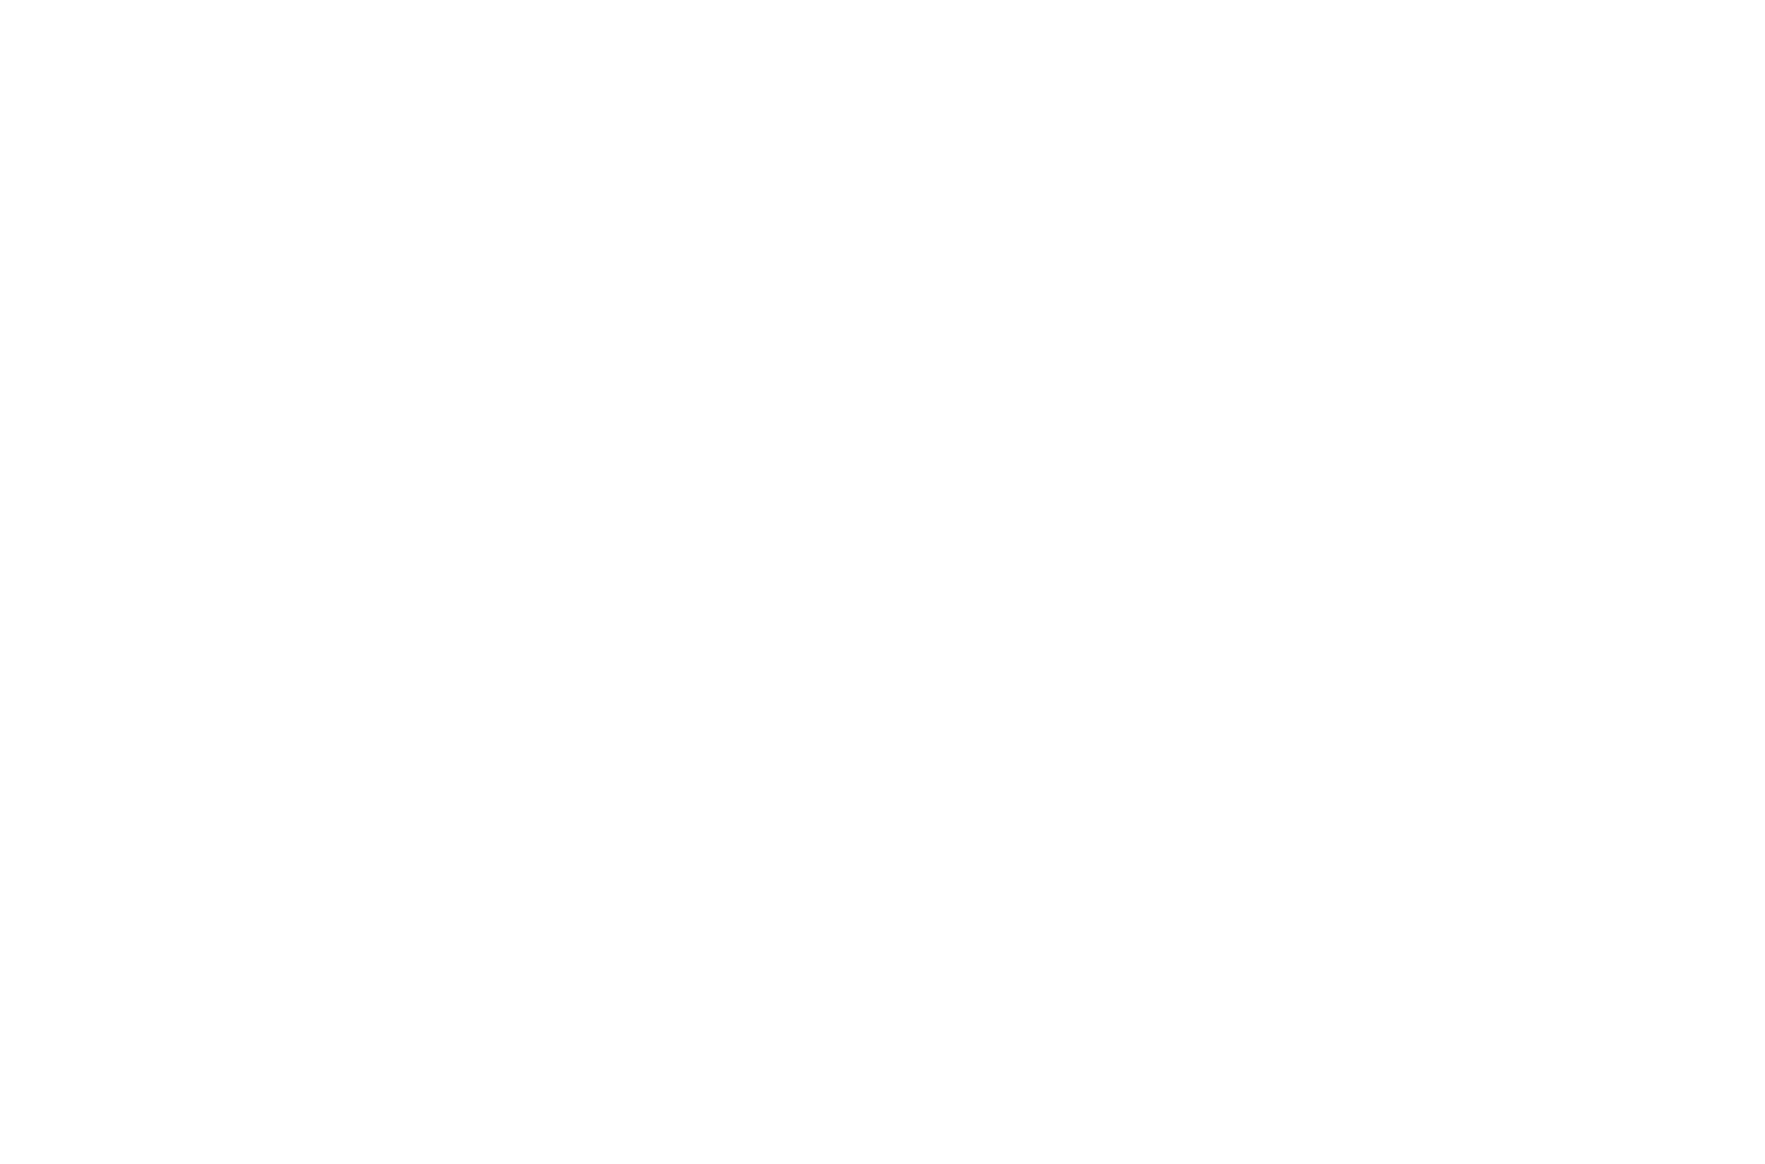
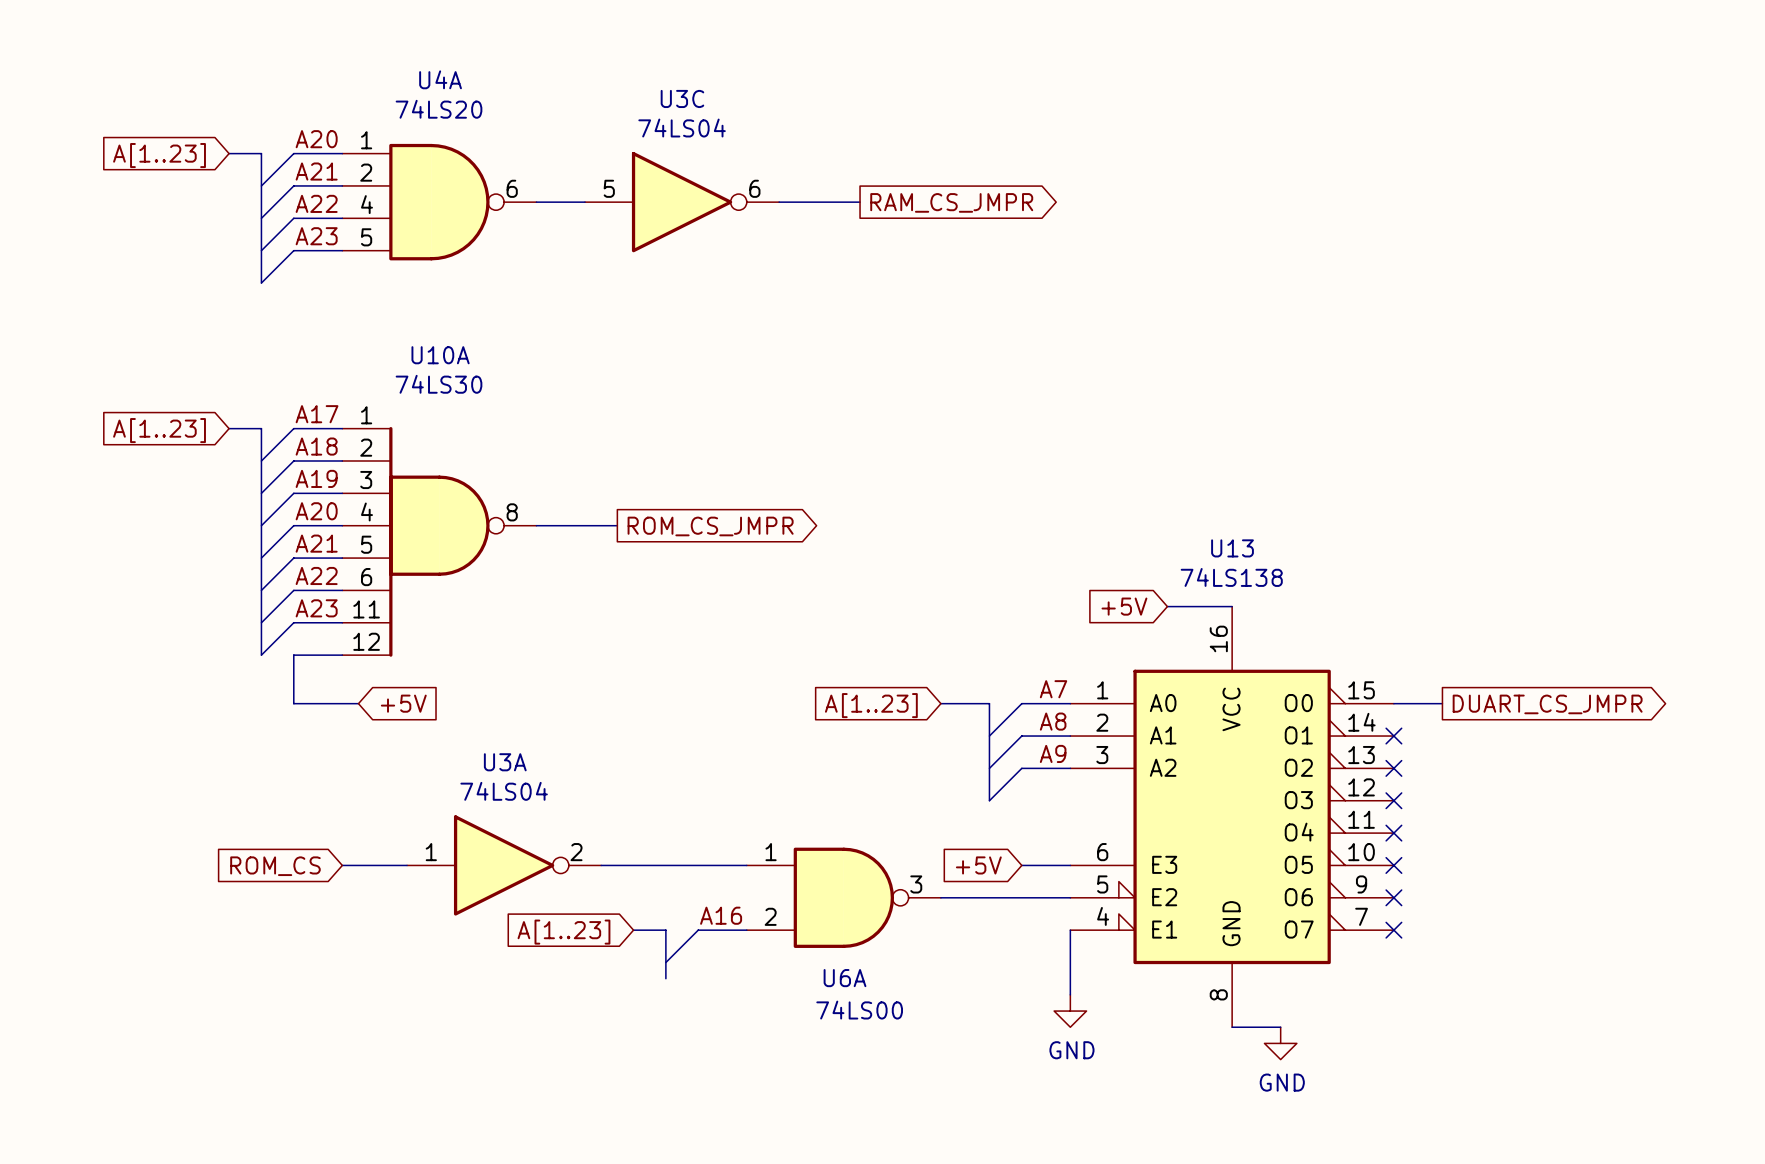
label: none -> A20 (316, 139)
bus: none -> (229, 153) (261, 153) (261, 283)
wire: none -> (342, 153) (293, 153) (261, 185)
global label: none -> A[1..23] (159, 155)
label: none -> A21 (316, 171)
wire: none -> (342, 185) (293, 185) (261, 218)
U4A: none -> 74LS20 (439, 202)
wire: none -> (536, 202) (585, 202)
U3C: none -> 74LS04 (682, 202)
wire: none -> (779, 202) (860, 202)
global label: none -> RAM_CS_JMPR (951, 202)
label: none -> A22 (316, 203)
wire: none -> (342, 218) (293, 218) (261, 250)
label: none -> A23 (316, 236)
wire: none -> (342, 250) (293, 250) (261, 283)
label: none -> A17 (317, 414)
bus: none -> (229, 428) (261, 428) (261, 655)
wire: none -> (342, 428) (293, 428) (261, 460)
global label: none -> A[1..23] (159, 430)
label: none -> A18 (316, 446)
wire: none -> (342, 460) (293, 460) (261, 493)
label: none -> A19 (316, 478)
wire: none -> (342, 493) (293, 493) (261, 525)
label: none -> A20 (316, 511)
wire: none -> (342, 525) (293, 525) (261, 558)
wire: none -> (536, 525) (617, 525)
global label: none -> ROM_CS_JMPR (710, 526)
U10A: none -> 74LS30 (439, 541)
label: none -> A21 (316, 543)
wire: none -> (342, 558) (293, 558) (261, 590)
label: none -> A22 (316, 575)
wire: none -> (342, 590) (293, 590) (261, 622)
global label: none -> +5V (1124, 606)
wire: none -> (1167, 606) (1232, 606)
label: none -> A23 (316, 608)
wire: none -> (342, 622) (293, 622) (261, 655)
wire: none -> (342, 655) (293, 655) (293, 703) (358, 703)
label: none -> A7 (1053, 689)
global label: none -> +5V (403, 703)
bus: none -> (940, 703) (989, 703) (989, 800)
wire: none -> (1070, 703) (1021, 703) (989, 736)
wire: none -> (1393, 703) (1442, 703)
global label: none -> DUART_CS_JMPR (1547, 704)
global label: none -> A[1..23] (871, 705)
label: none -> A8 (1053, 721)
wire: none -> (1070, 736) (1021, 736) (989, 768)
no-connect mark: none -> (1393, 736)
label: none -> A9 (1053, 753)
wire: none -> (1070, 768) (1021, 768) (989, 800)
no-connect mark: none -> (1393, 768)
no-connect mark: none -> (1393, 800)
U13: none -> 74LS138 (1232, 816)
no-connect mark: none -> (1393, 833)
wire: none -> (342, 865) (407, 865)
U3A: none -> 74LS04 (504, 865)
wire: none -> (601, 865) (746, 865)
global label: none -> +5V (978, 865)
wire: none -> (1021, 865) (1070, 865)
no-connect mark: none -> (1393, 865)
global label: none -> ROM_CS (275, 866)
U6A: none -> 74LS00 (843, 897)
wire: none -> (940, 897) (1070, 897)
no-connect mark: none -> (1393, 897)
label: none -> A16 (721, 915)
bus: none -> (633, 930) (665, 930) (665, 978)
wire: none -> (746, 930) (698, 930) (665, 962)
wire: none -> (1070, 930) (1070, 994)
no-connect mark: none -> (1393, 930)
global label: none -> A[1..23] (563, 932)
power symbol: none -> GND (1070, 1011)
wire: none -> (1232, 1027) (1280, 1027)
power symbol: none -> GND (1280, 1043)

